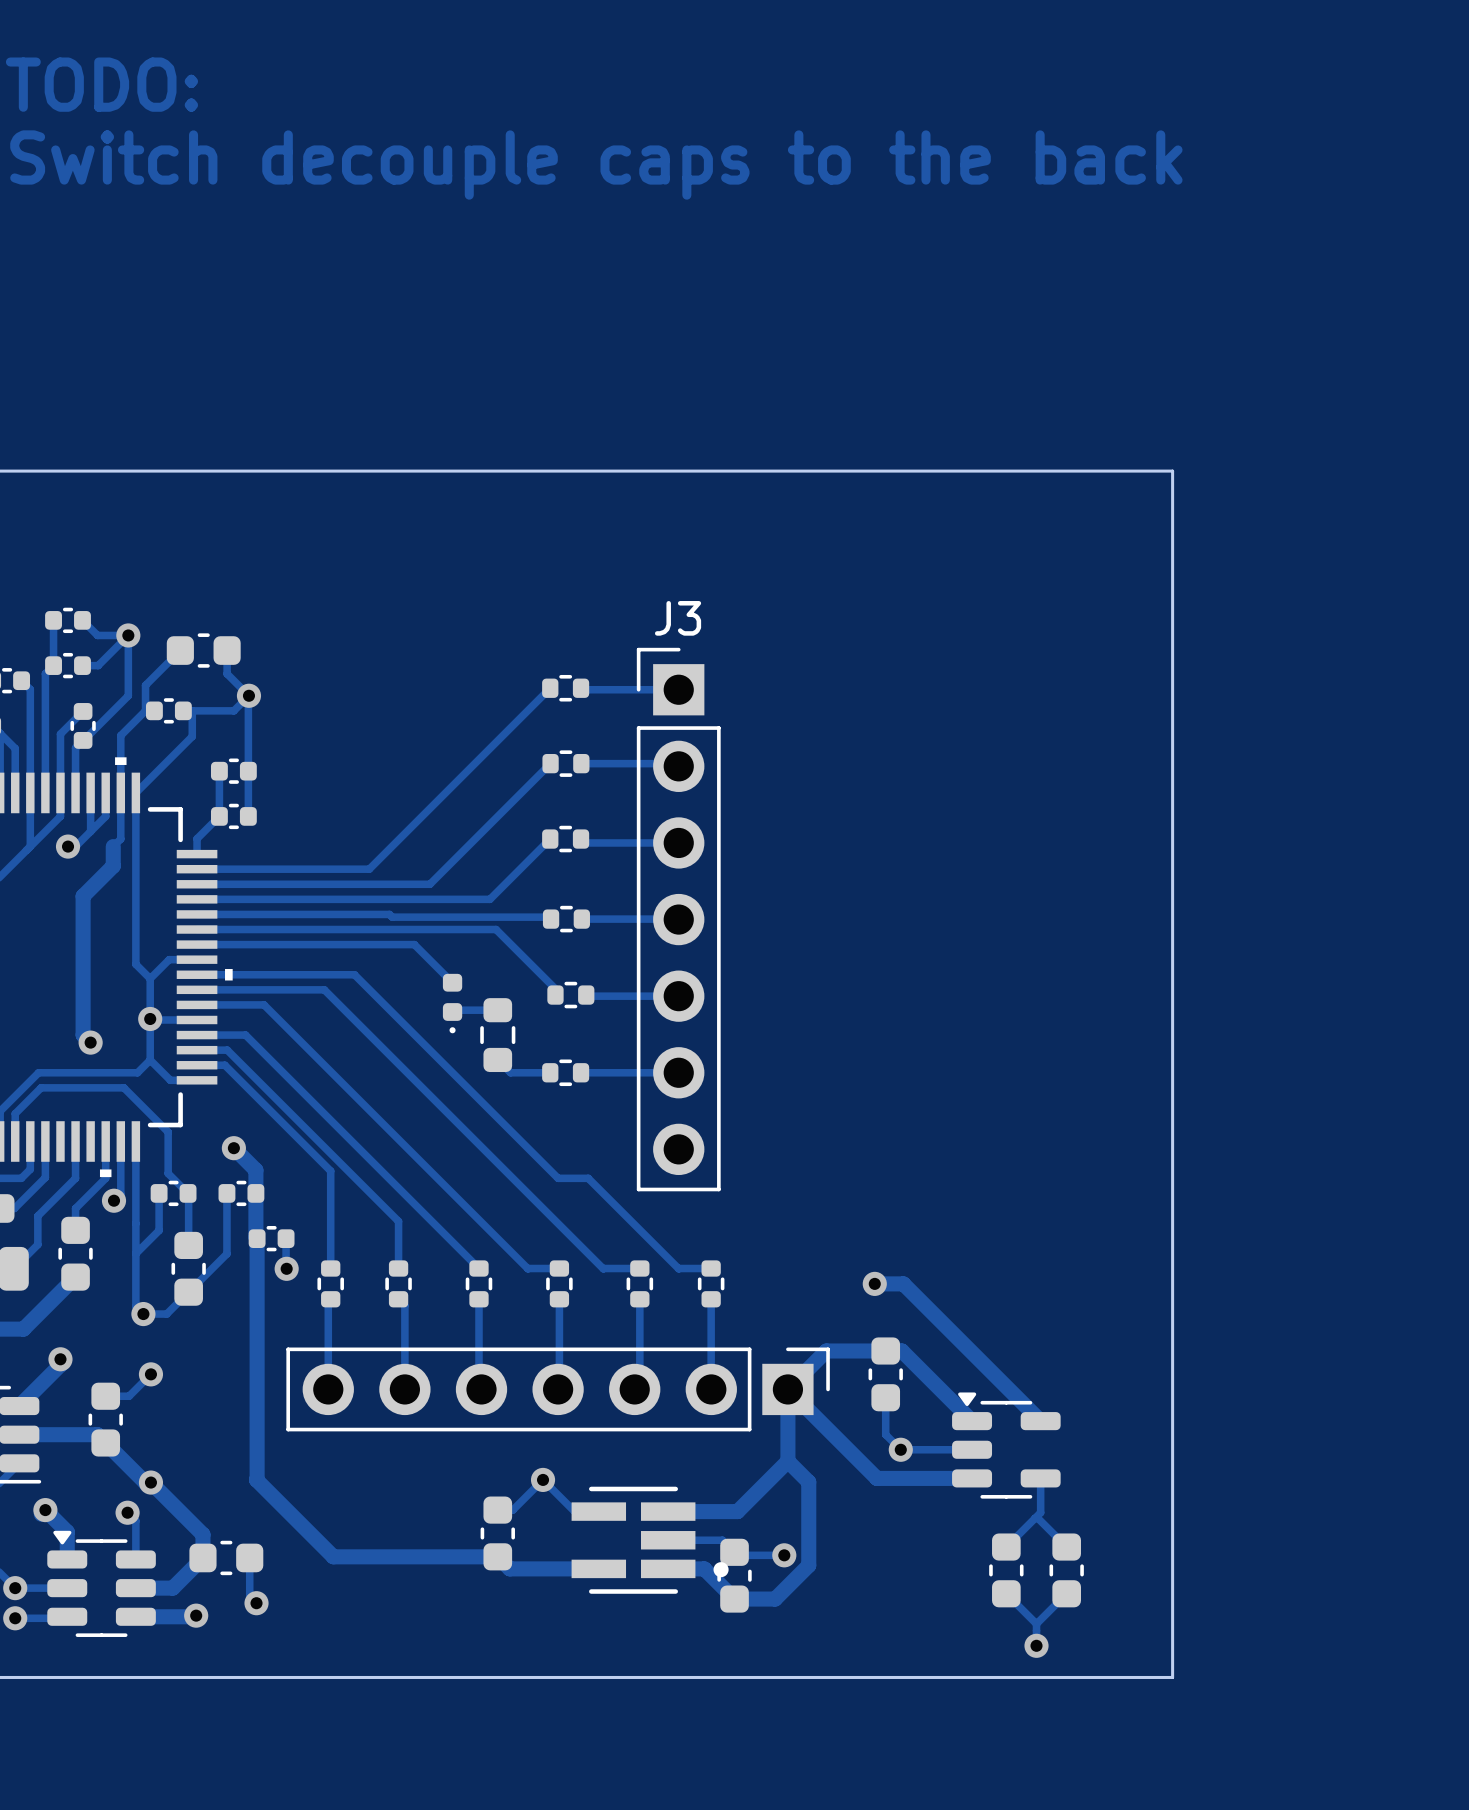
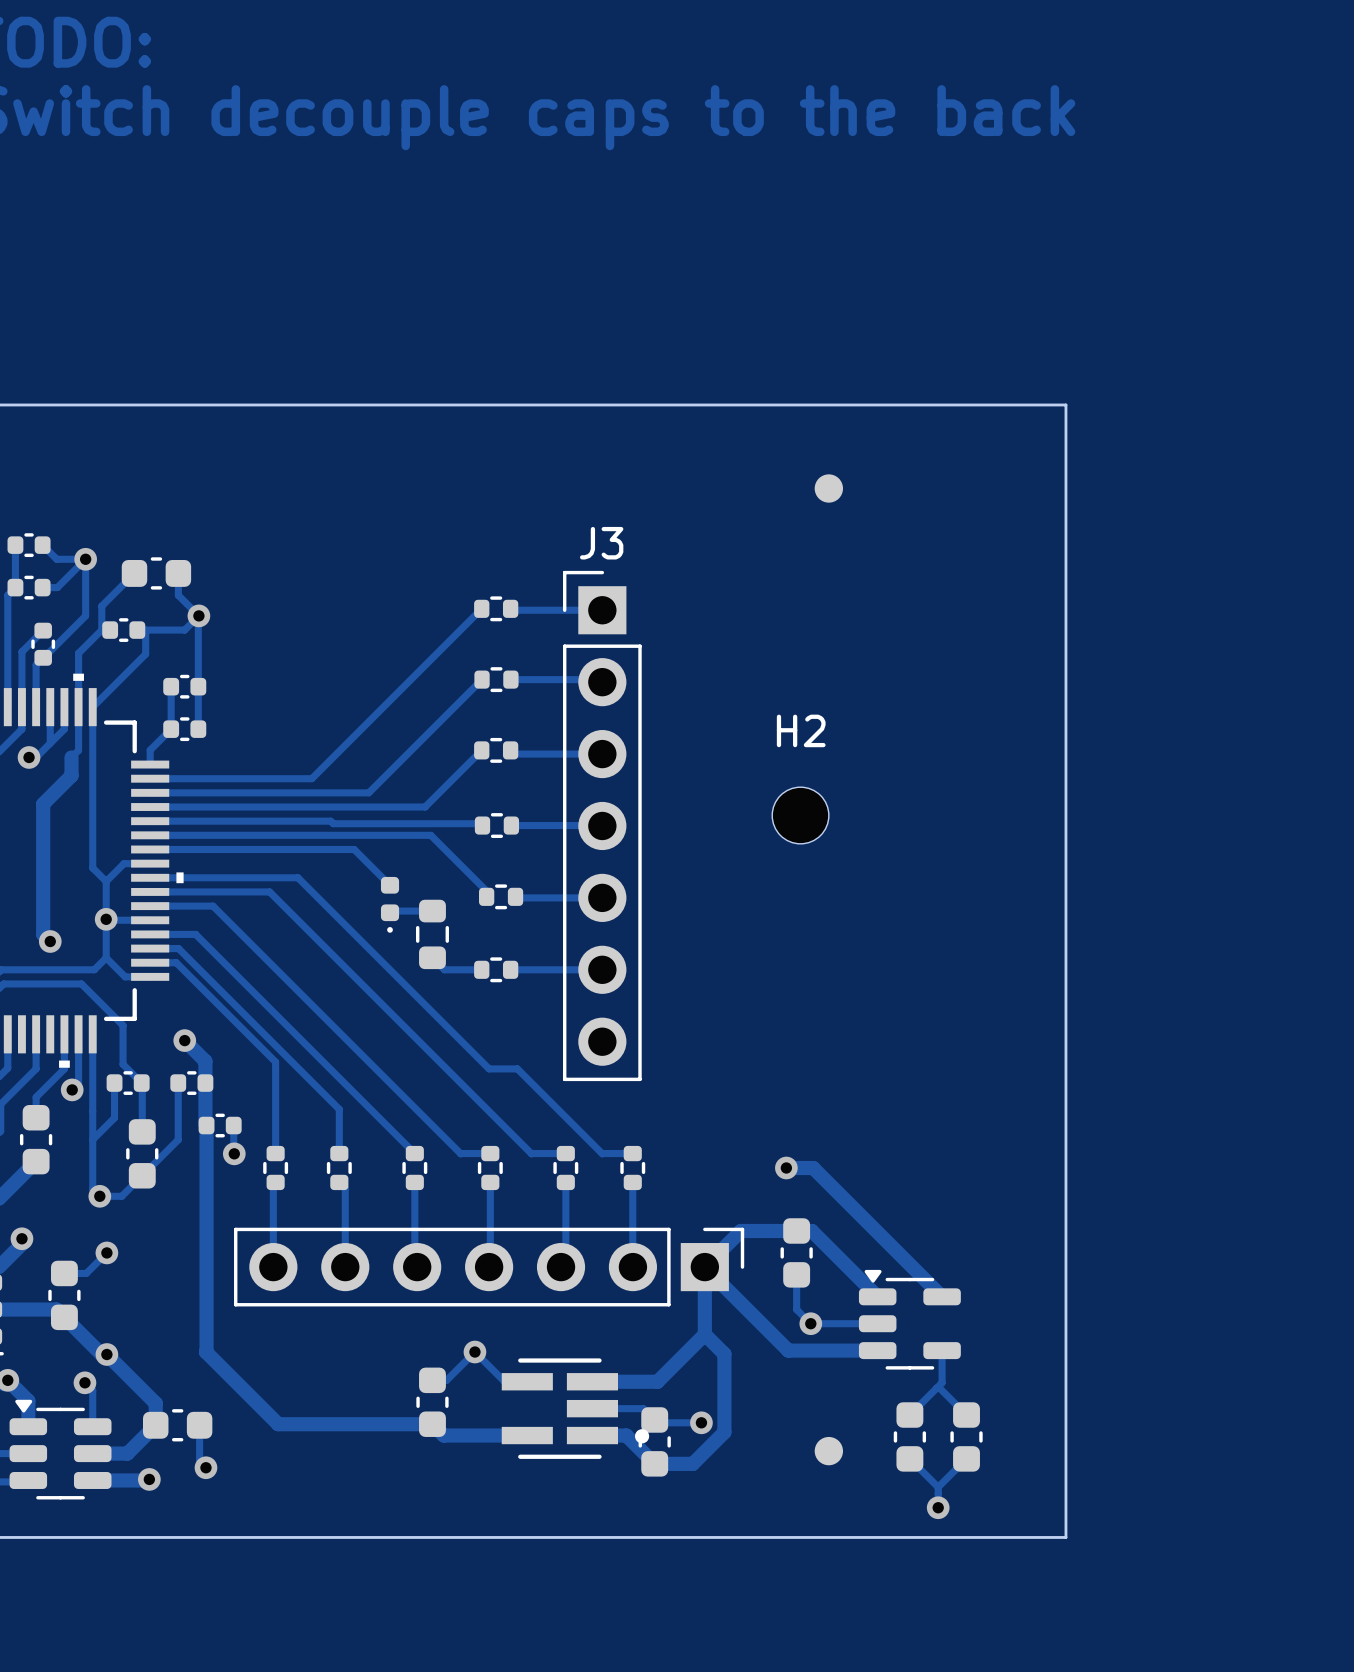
part: none -> (828, 488)
H2: none -> (800, 815)
part: none -> (828, 1451)

